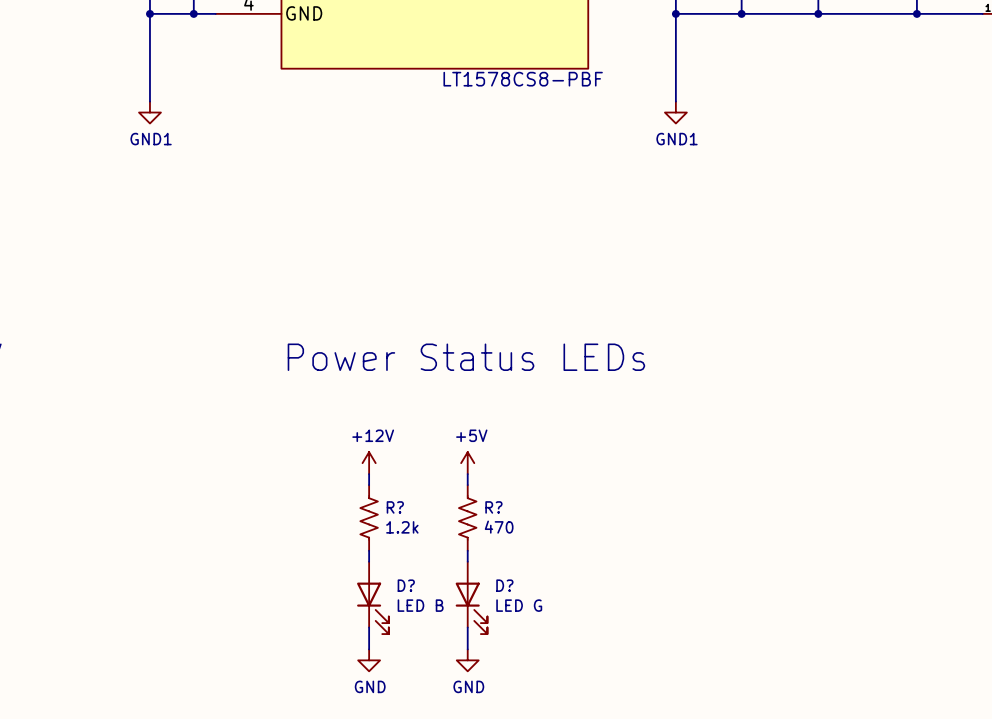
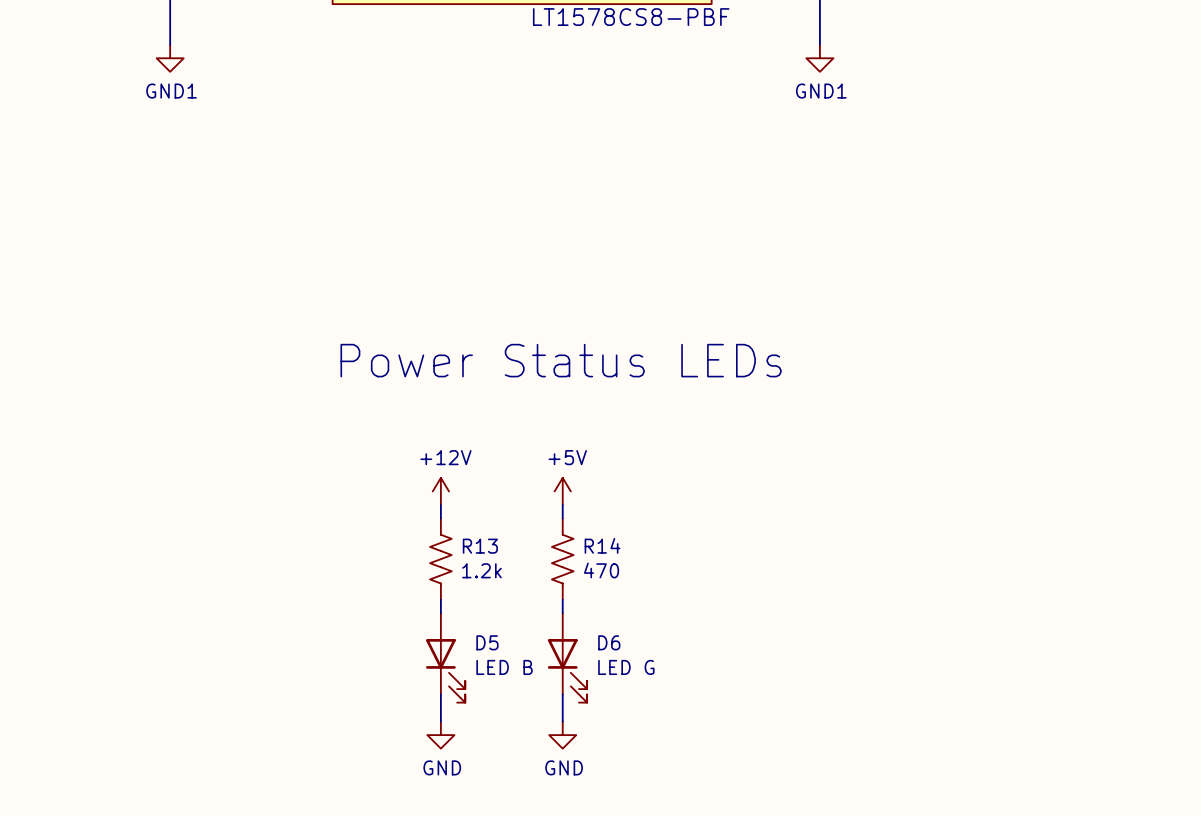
R? name: R? (395, 507) -> R13 (480, 546)
R? name: R? (493, 507) -> R14 (602, 545)
D? name: D? (406, 585) -> D5 (487, 642)
D? name: D? (504, 585) -> D6 (609, 642)

